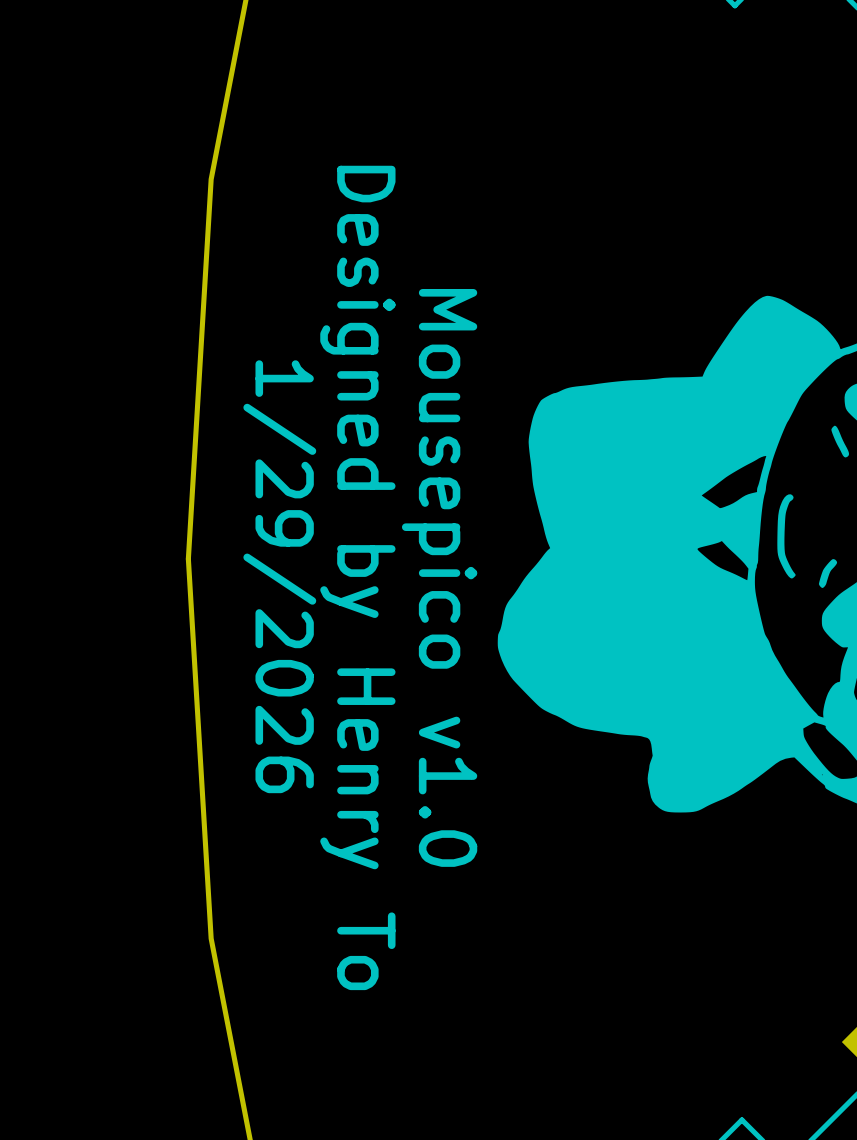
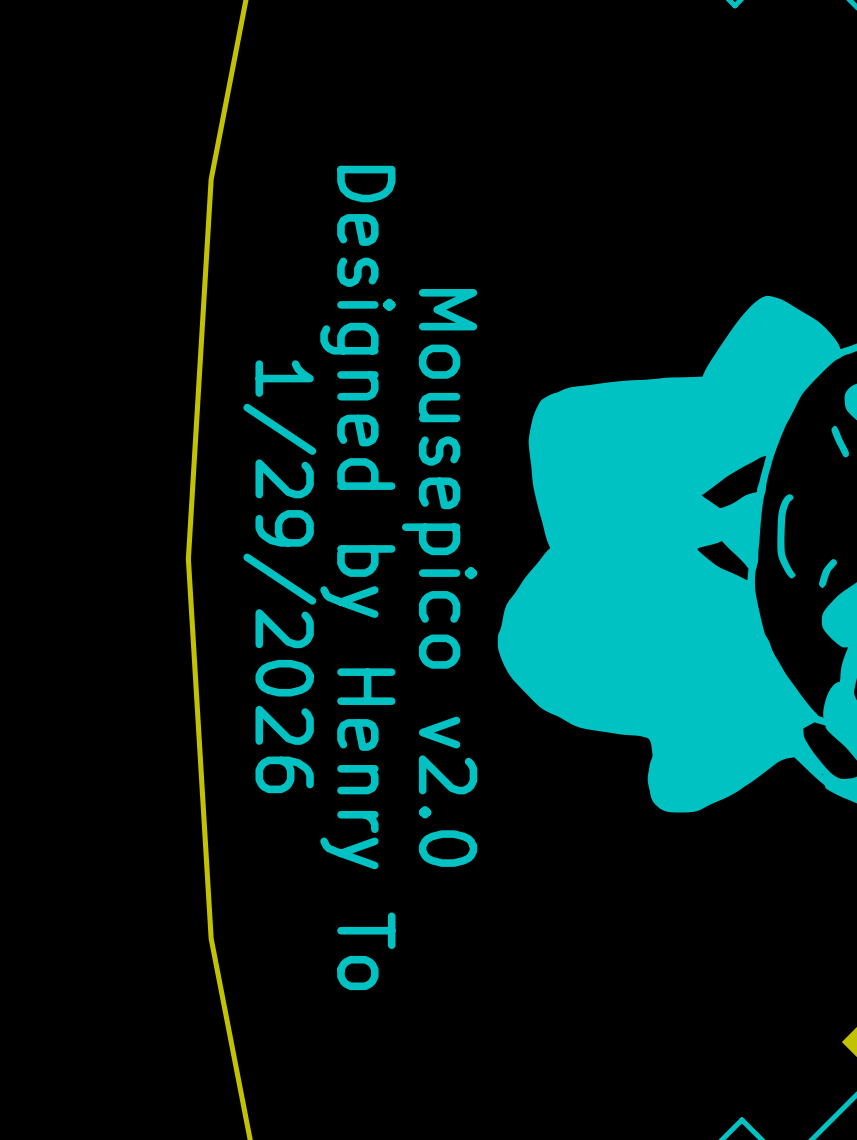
text: Mousepico v1.0 (439, 577) -> Mousepico v2.0 (439, 577)

